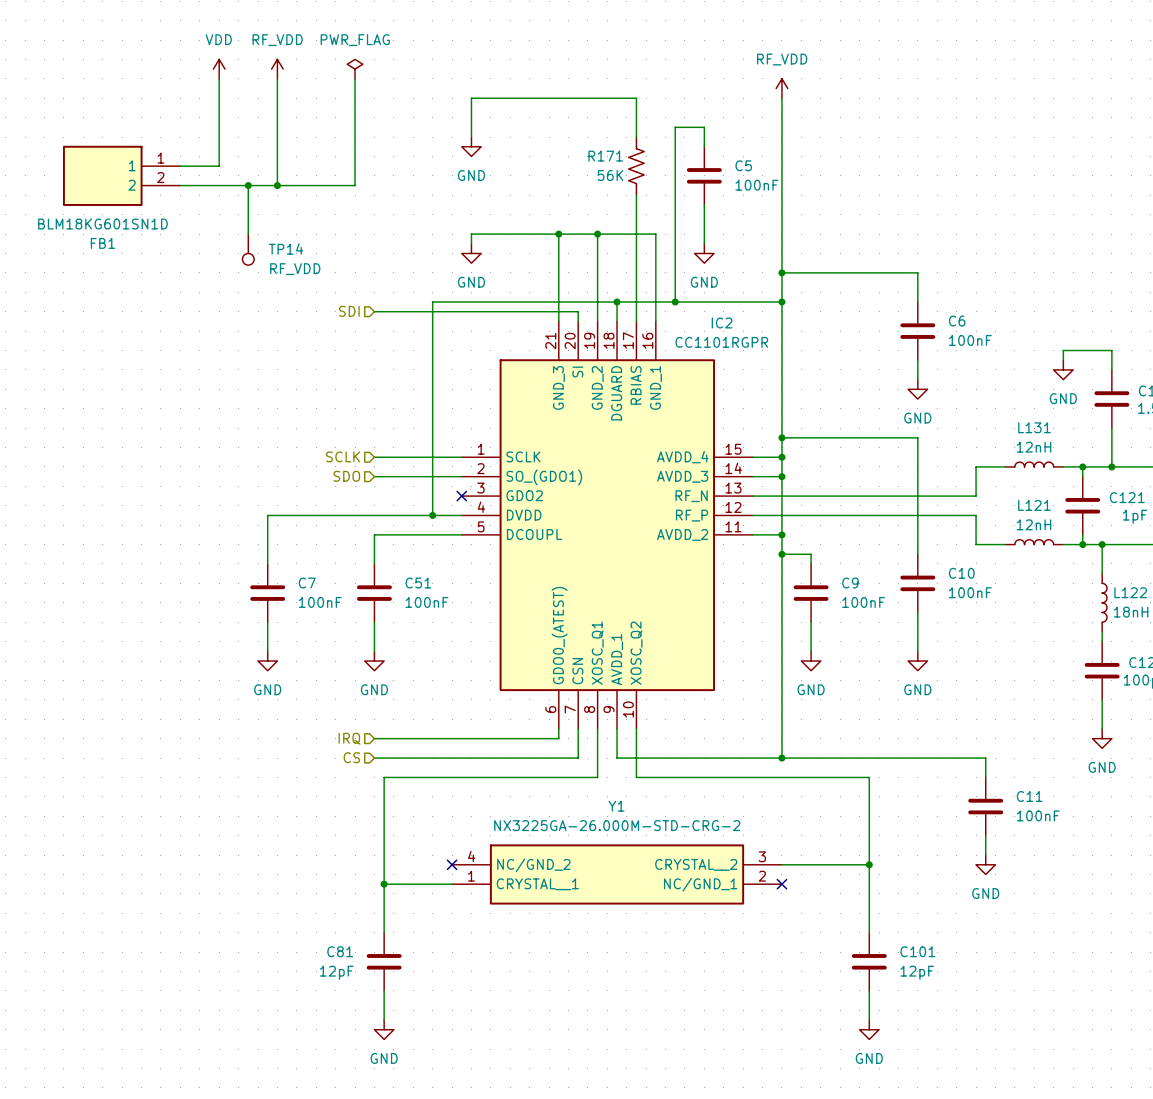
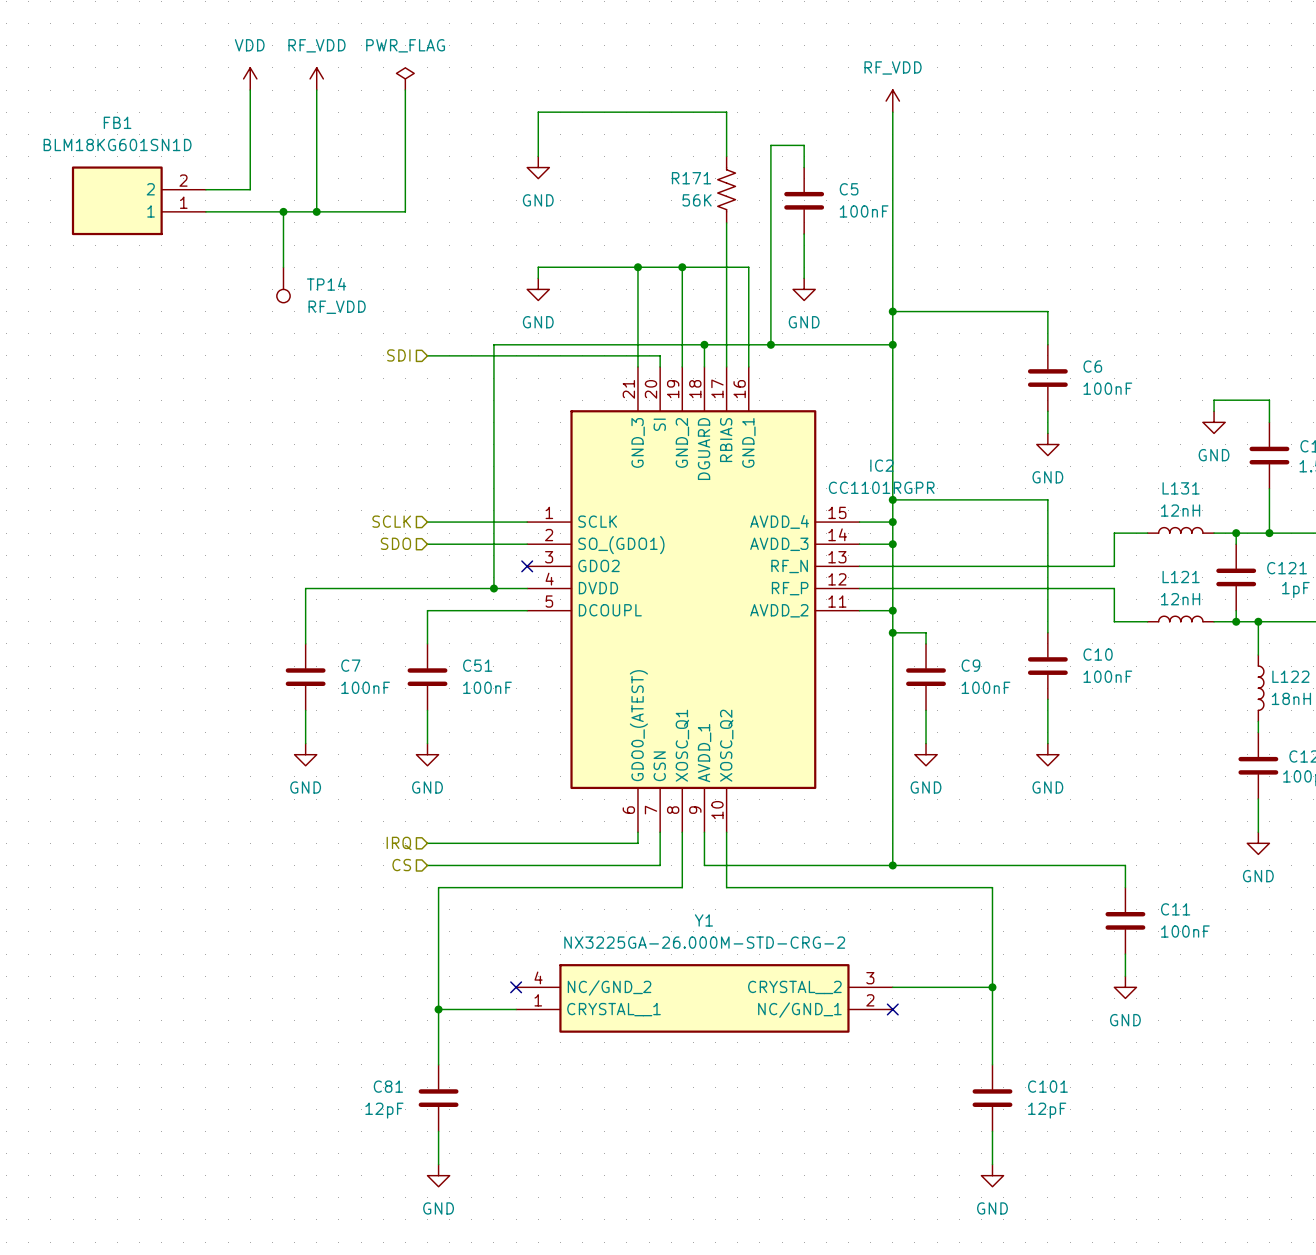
FB1 flip: as is (102, 175) -> up-down (117, 200)
IC2 name position: IC2 (722, 322) -> IC2 (881, 465)
IC2 value position: CC1101RGPR (721, 342) -> CC1101RGPR (881, 487)

